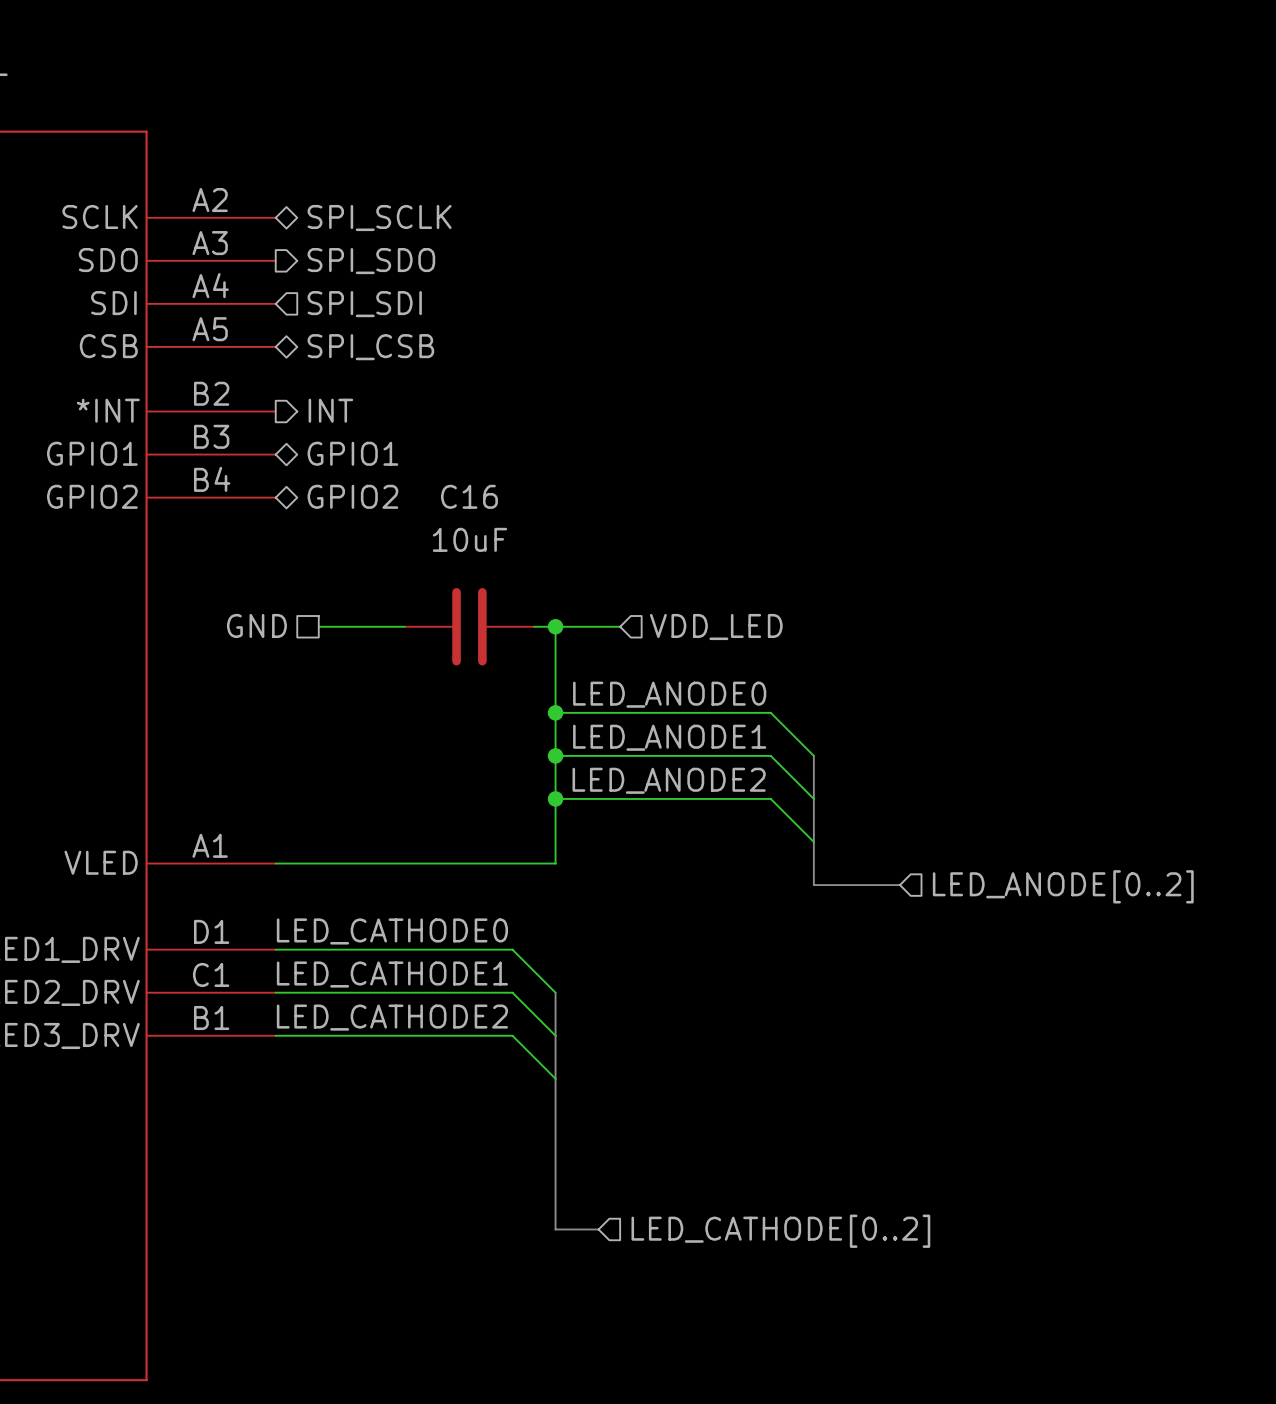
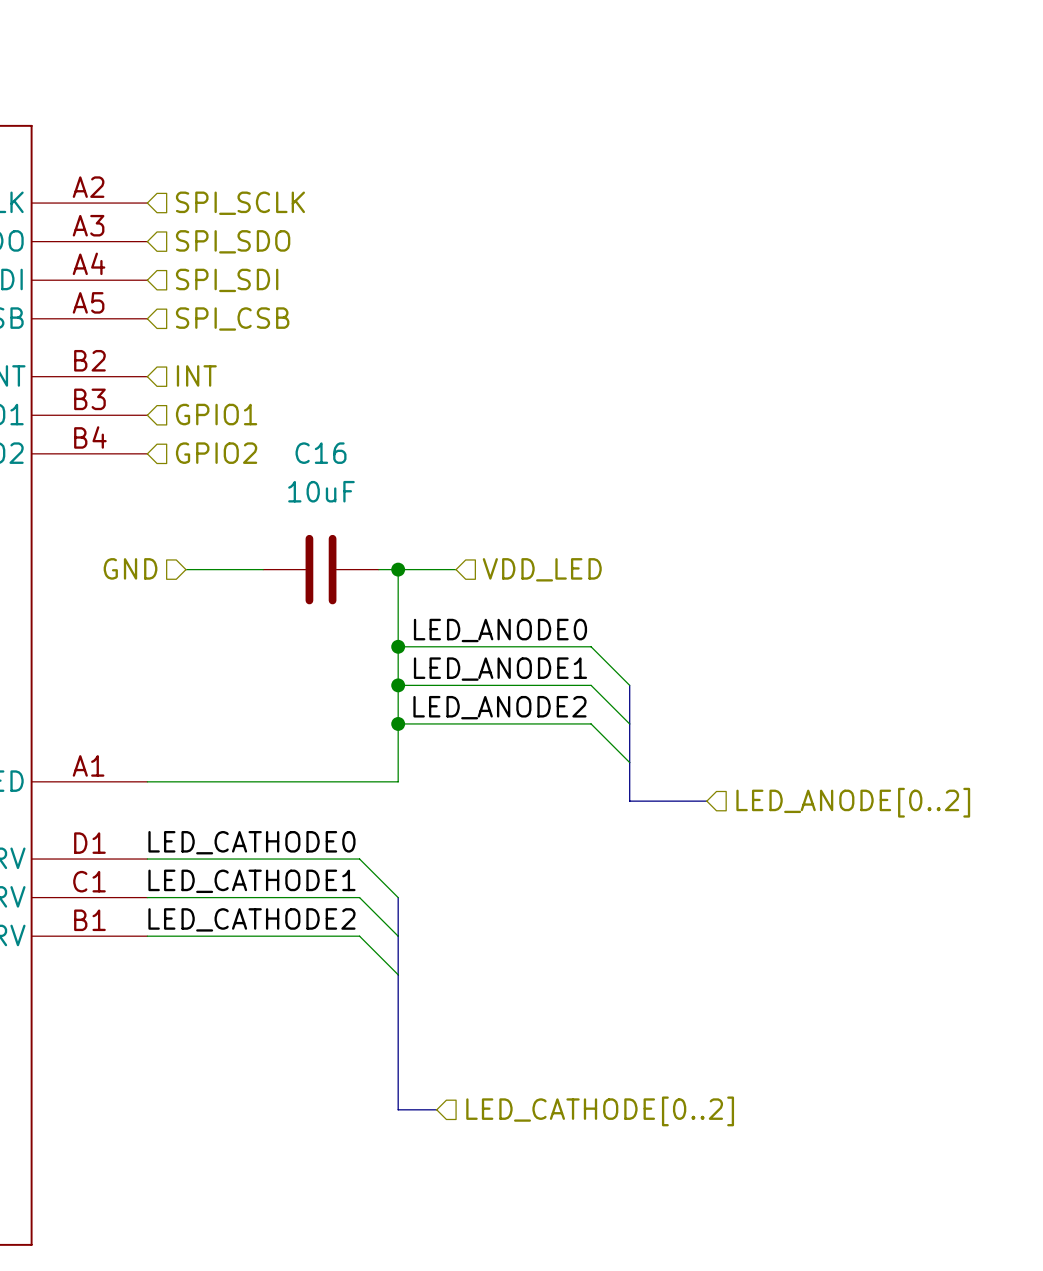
hierarchical label shape: bidirectional (379, 218) -> input (240, 203)
hierarchical label shape: output (371, 261) -> input (233, 241)
hierarchical label shape: bidirectional (370, 347) -> input (232, 318)
hierarchical label shape: output (330, 410) -> input (196, 375)
hierarchical label shape: bidirectional (352, 453) -> input (216, 414)
hierarchical label shape: bidirectional (352, 496) -> input (216, 453)
hierarchical label shape: passive (256, 625) -> input (130, 568)

